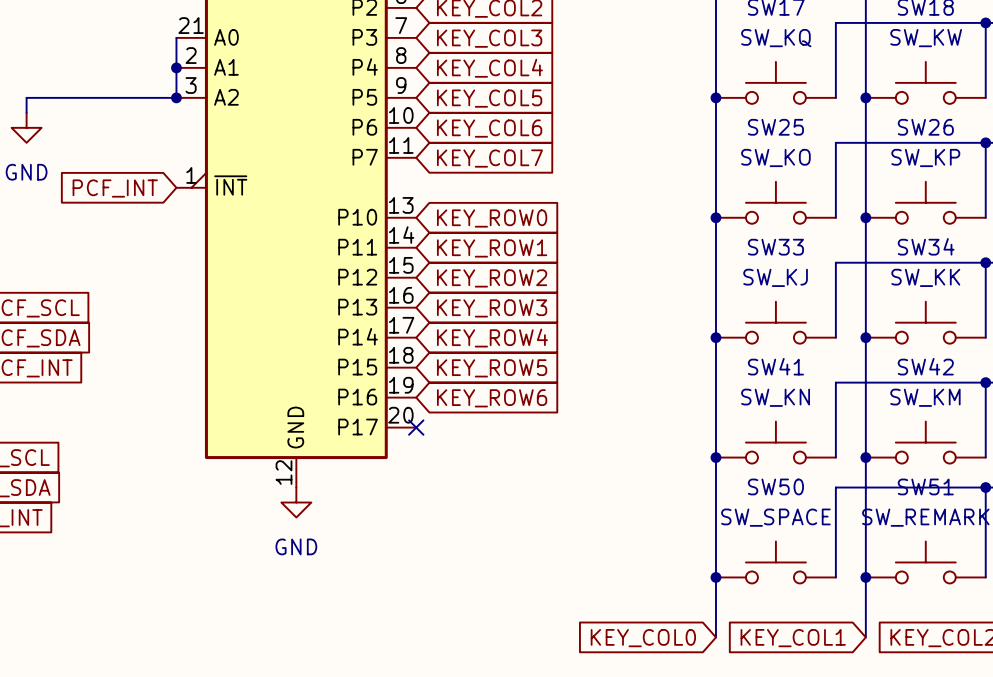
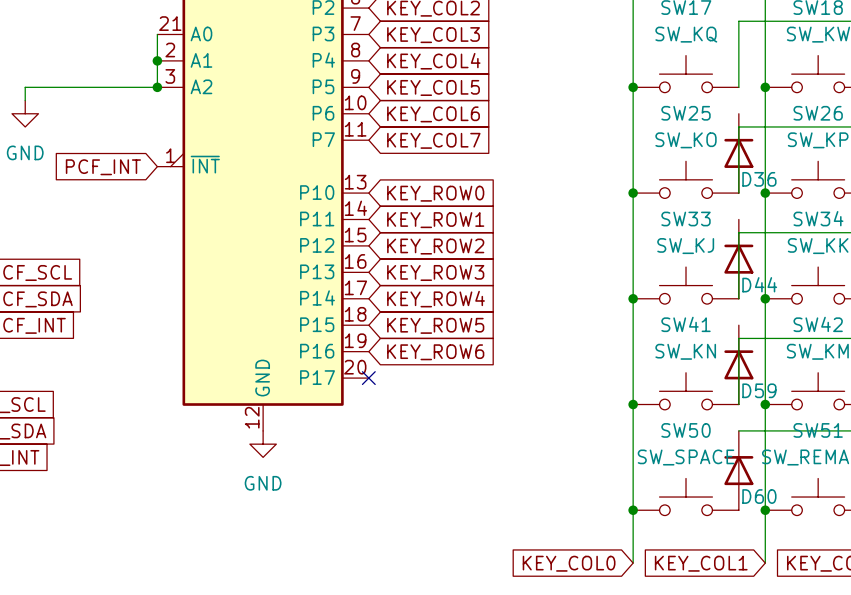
D36: none -> (738, 153)
D44: none -> (738, 259)
D59: none -> (738, 364)
D60: none -> (738, 470)

